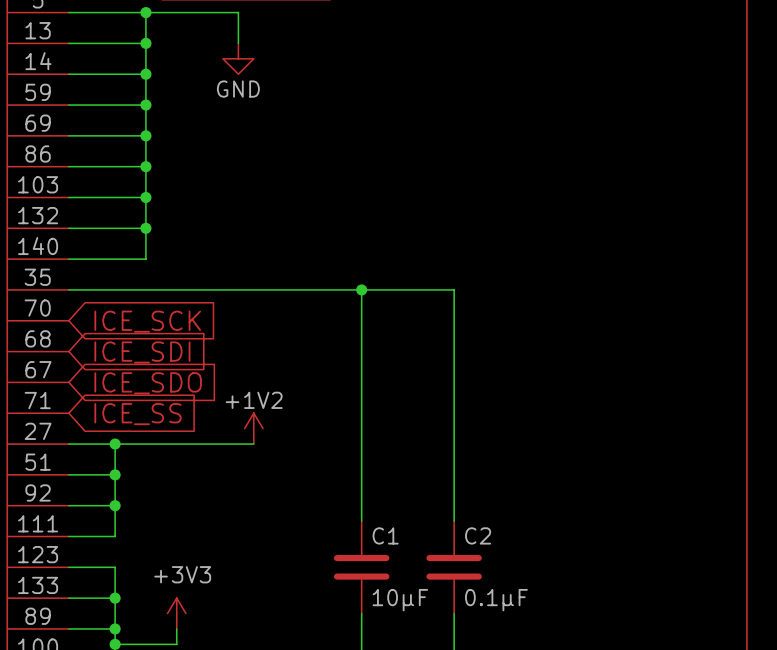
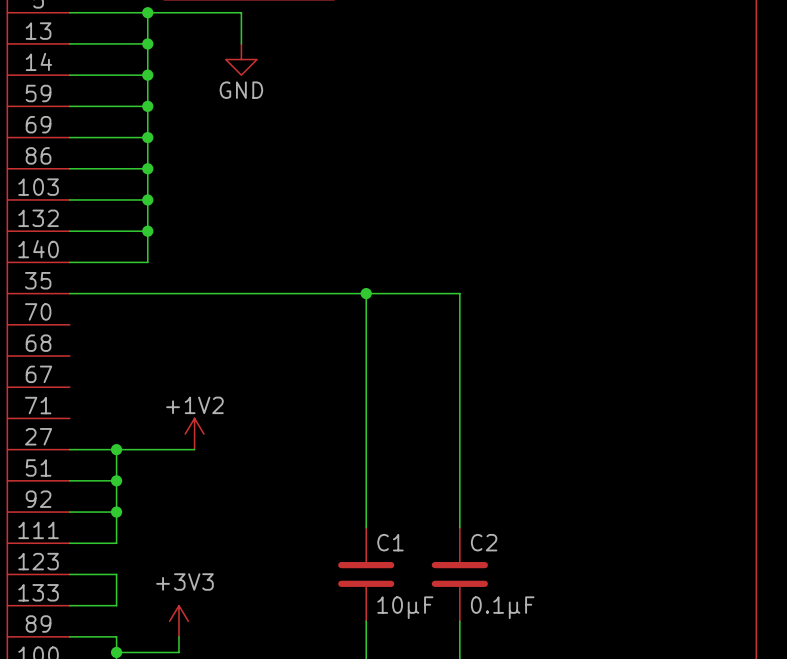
global label: ICE_SCK (147, 321) -> none
global label: ICE_SDI (142, 352) -> none
global label: ICE_SDO (148, 383) -> none
global label: ICE_SS (138, 414) -> none
power symbol position: +1V2 (253, 428) -> +1V2 (194, 434)
wire: (192, 444) (253, 444) -> none
wire: (115, 598) (115, 628) -> none
junction: (115, 598) -> none
junction: (115, 628) -> none

